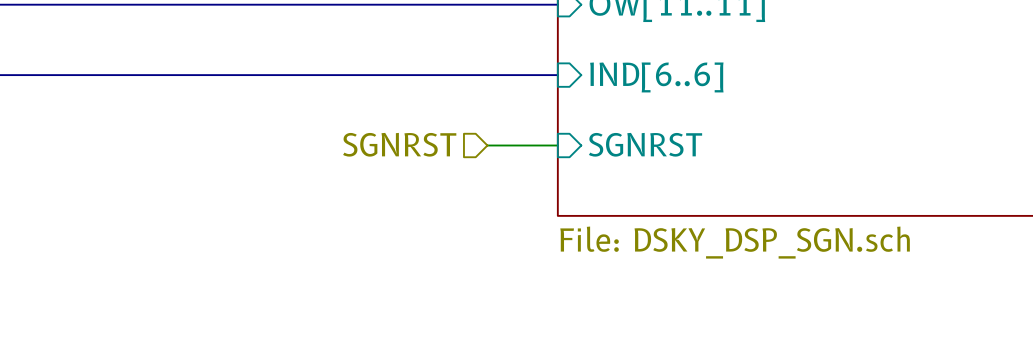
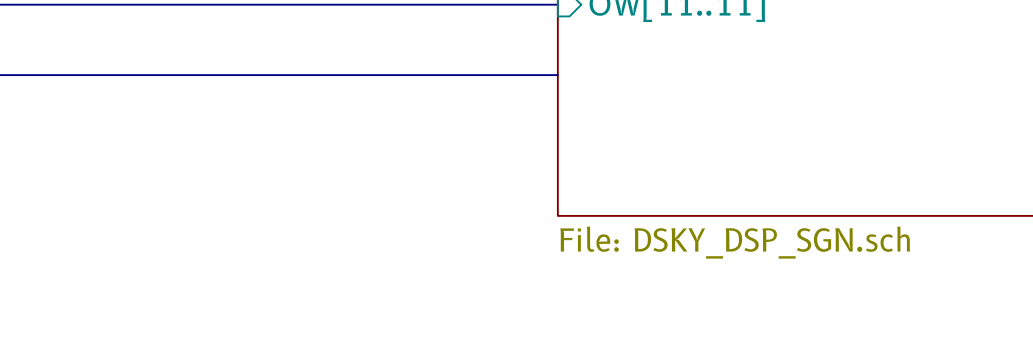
sheet pin: IND[6..6] (656, 77) -> none
hierarchical label: SGNRST (399, 144) -> none
sheet pin: SGNRST (645, 144) -> none
wire: (487, 145) (557, 145) -> none

